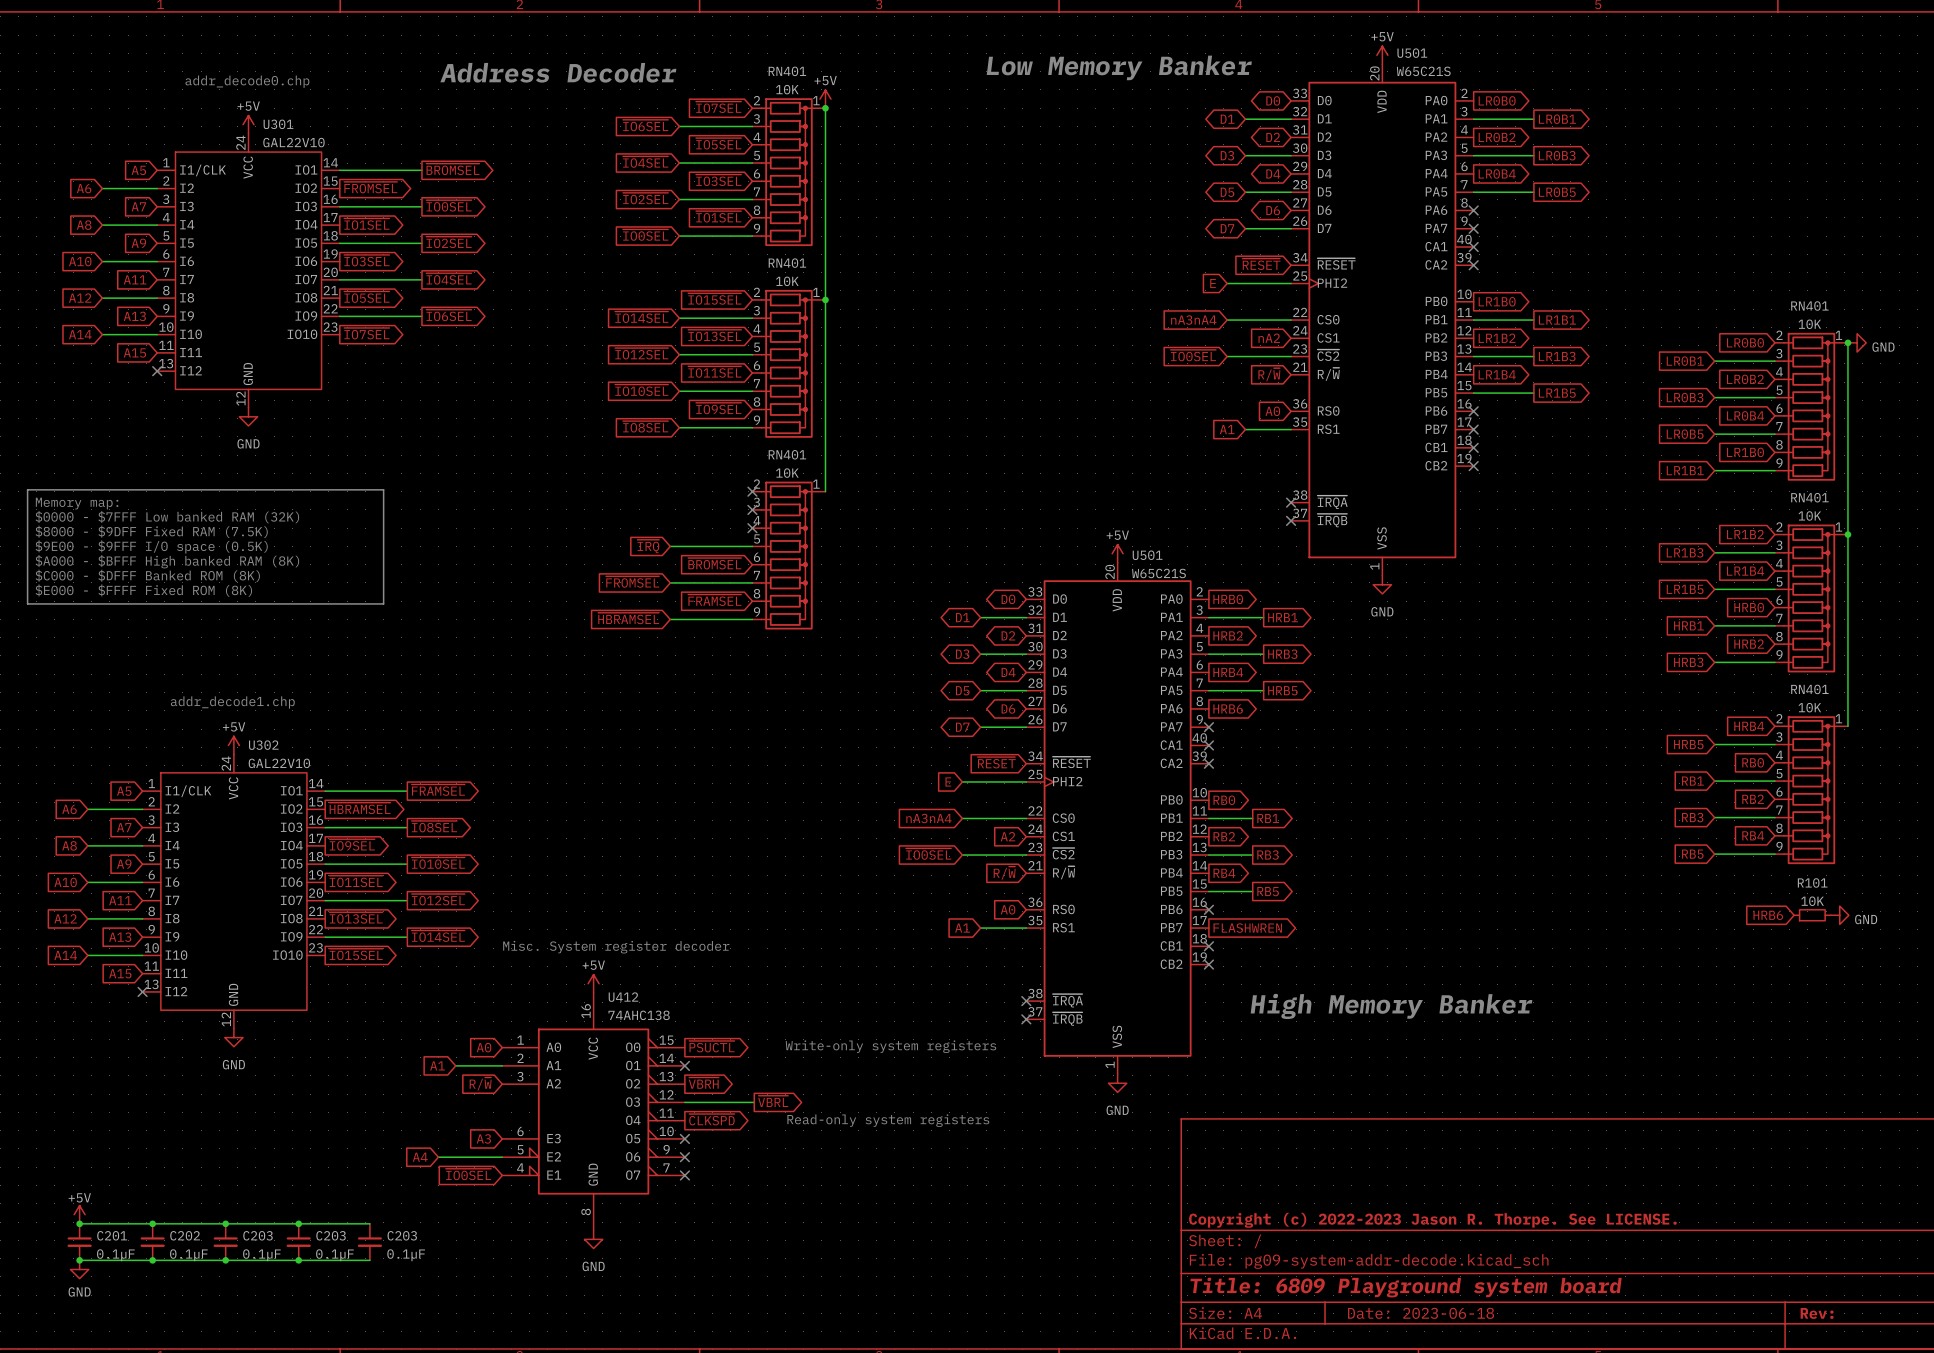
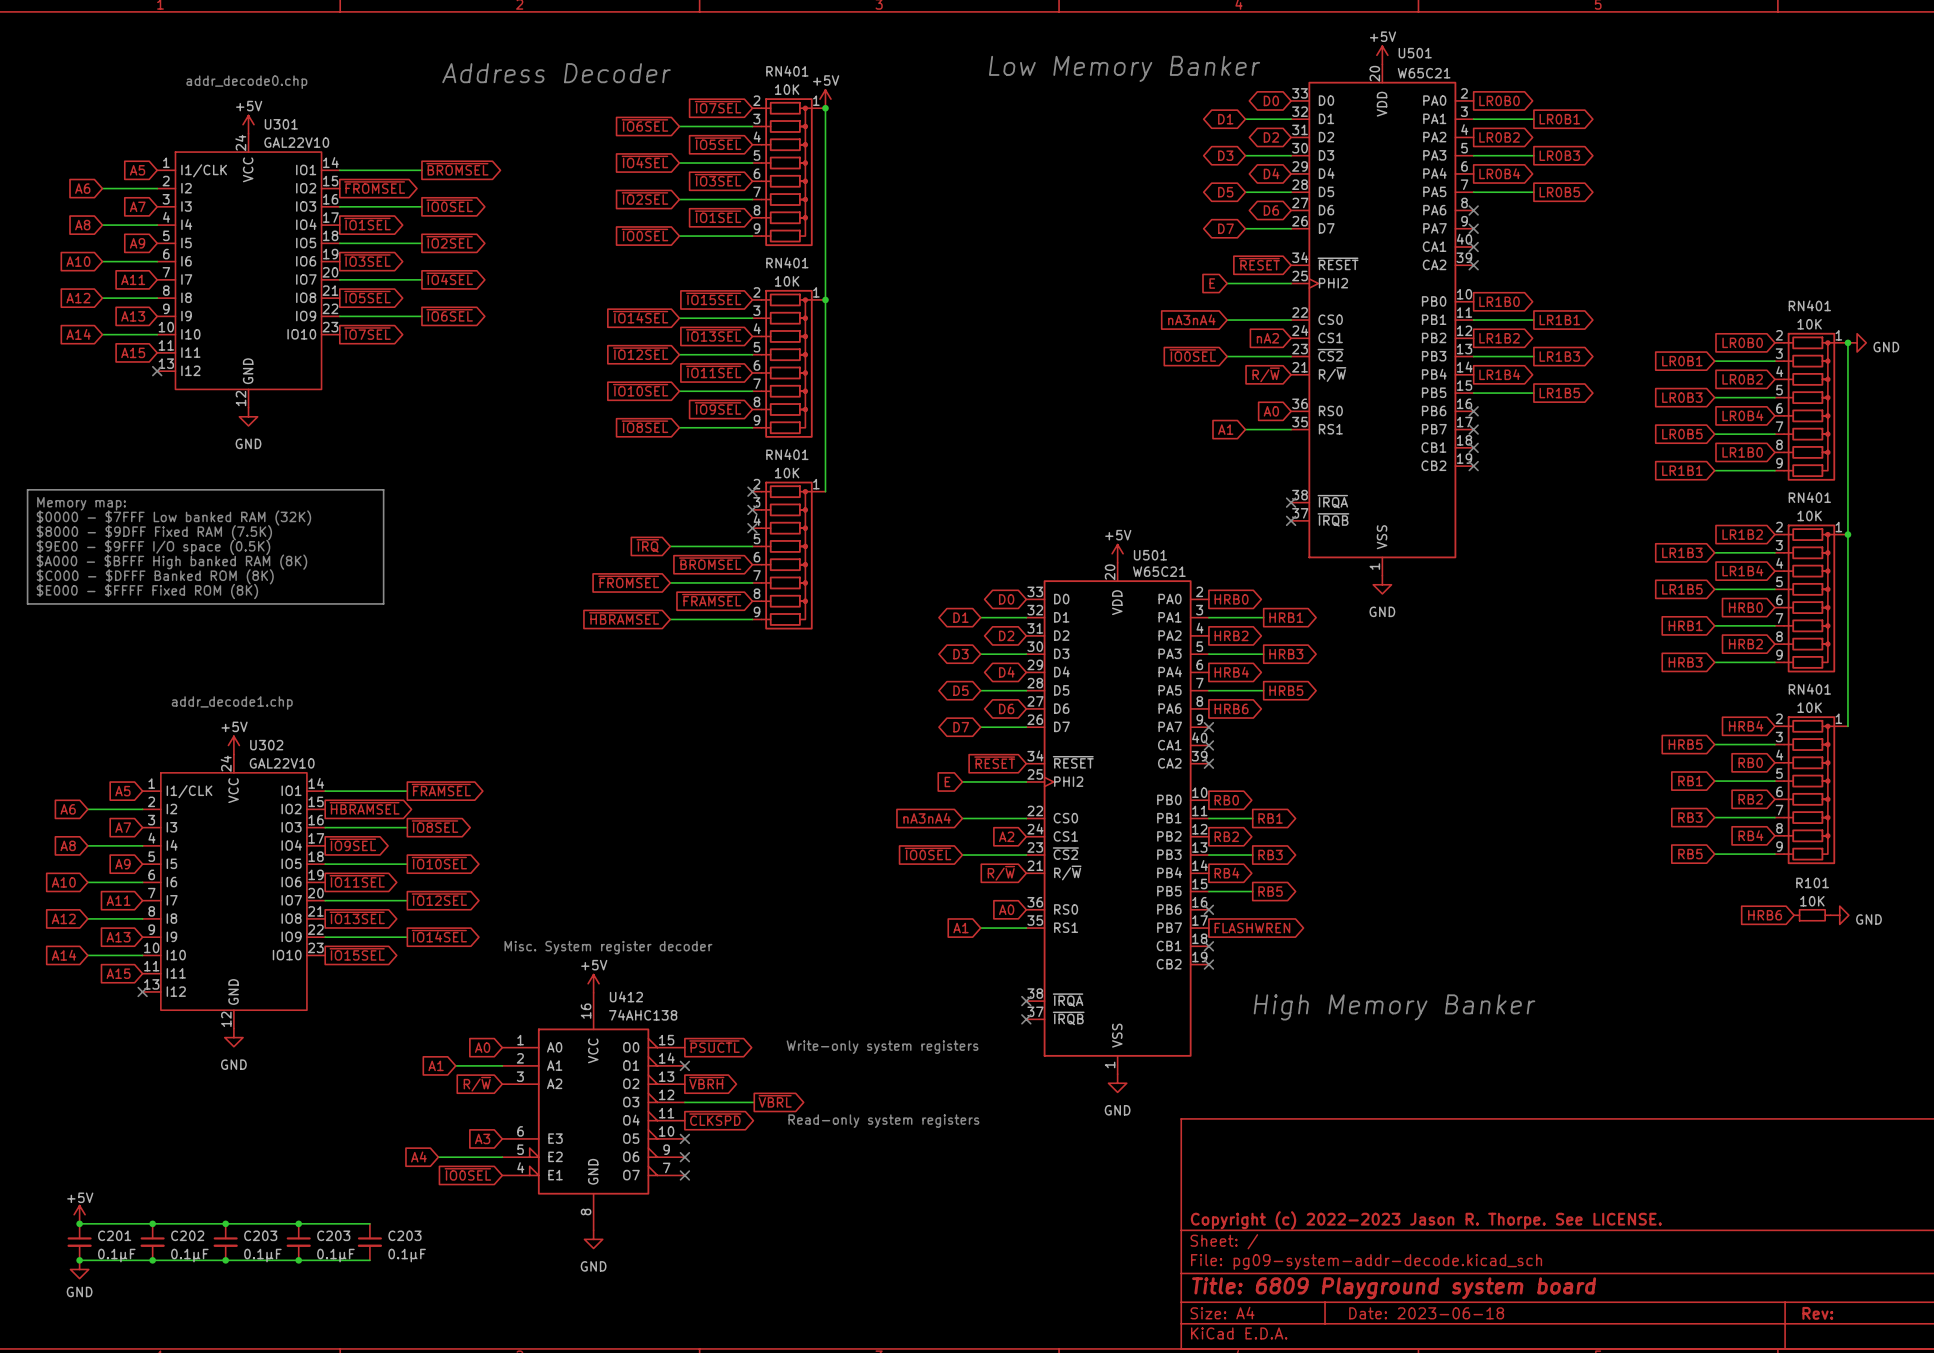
U501 value: W65C21S (1423, 71) -> W65C21 (1424, 73)
U501 value: W65C21S (1159, 573) -> W65C21 (1159, 571)

